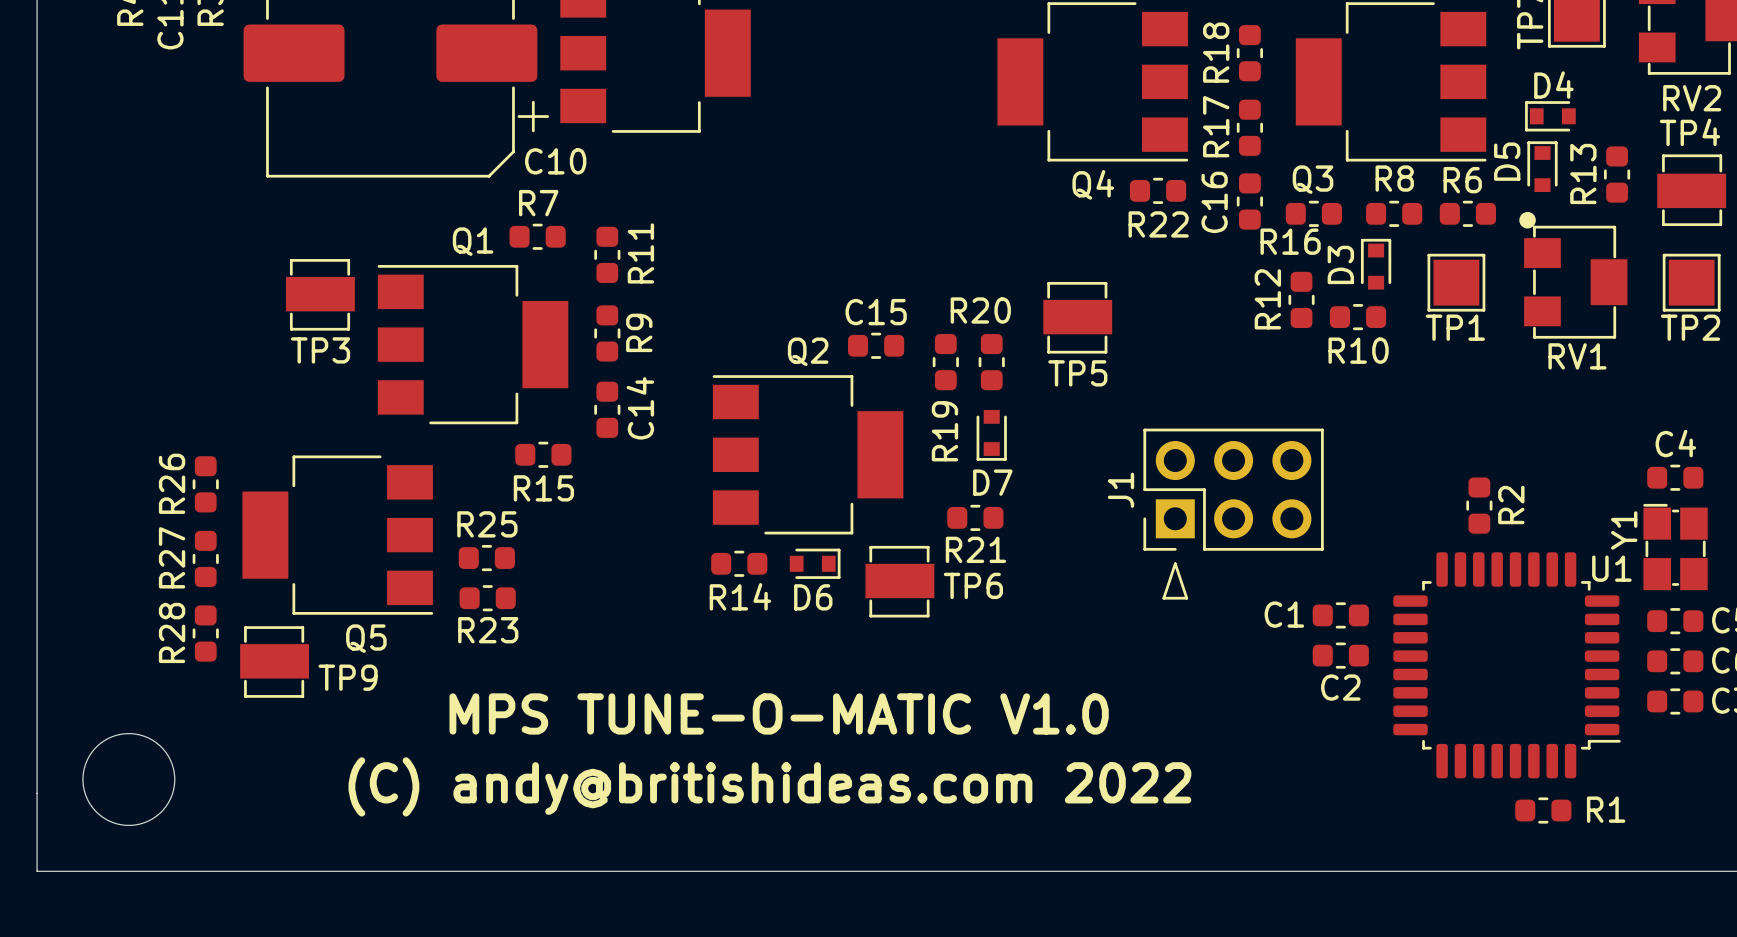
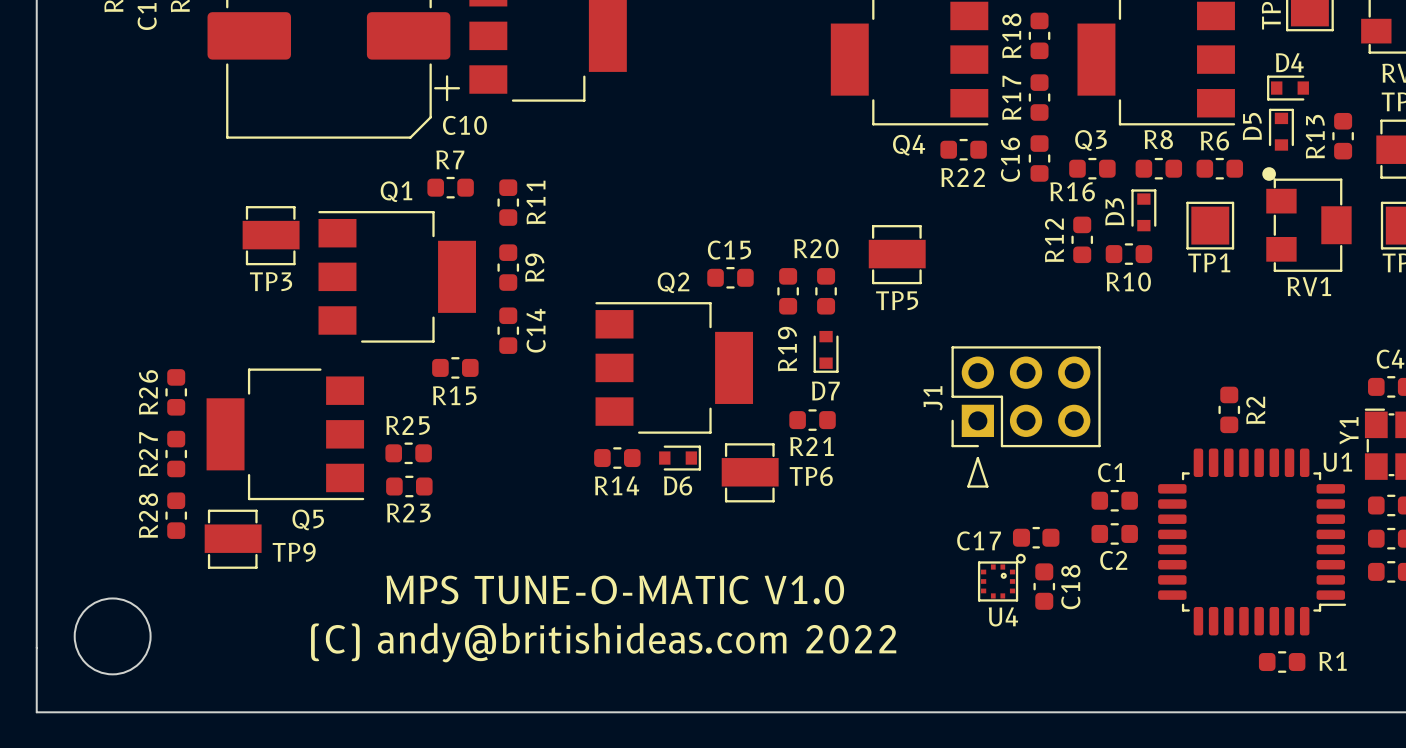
C1 name position: C1 (1284, 614) -> C1 (1111, 472)
C17: none -> (1036, 537)
U4: none -> (1001, 577)
text position: MPS TUNE-O-MATIC V1.0 (779, 713) -> MPS TUNE-O-MATIC V1.0 (615, 589)
C18: none -> (1044, 586)
text position: (C) andy@britishideas.com 2022 (769, 786) -> (C) andy@britishideas.com 2022 (603, 642)

